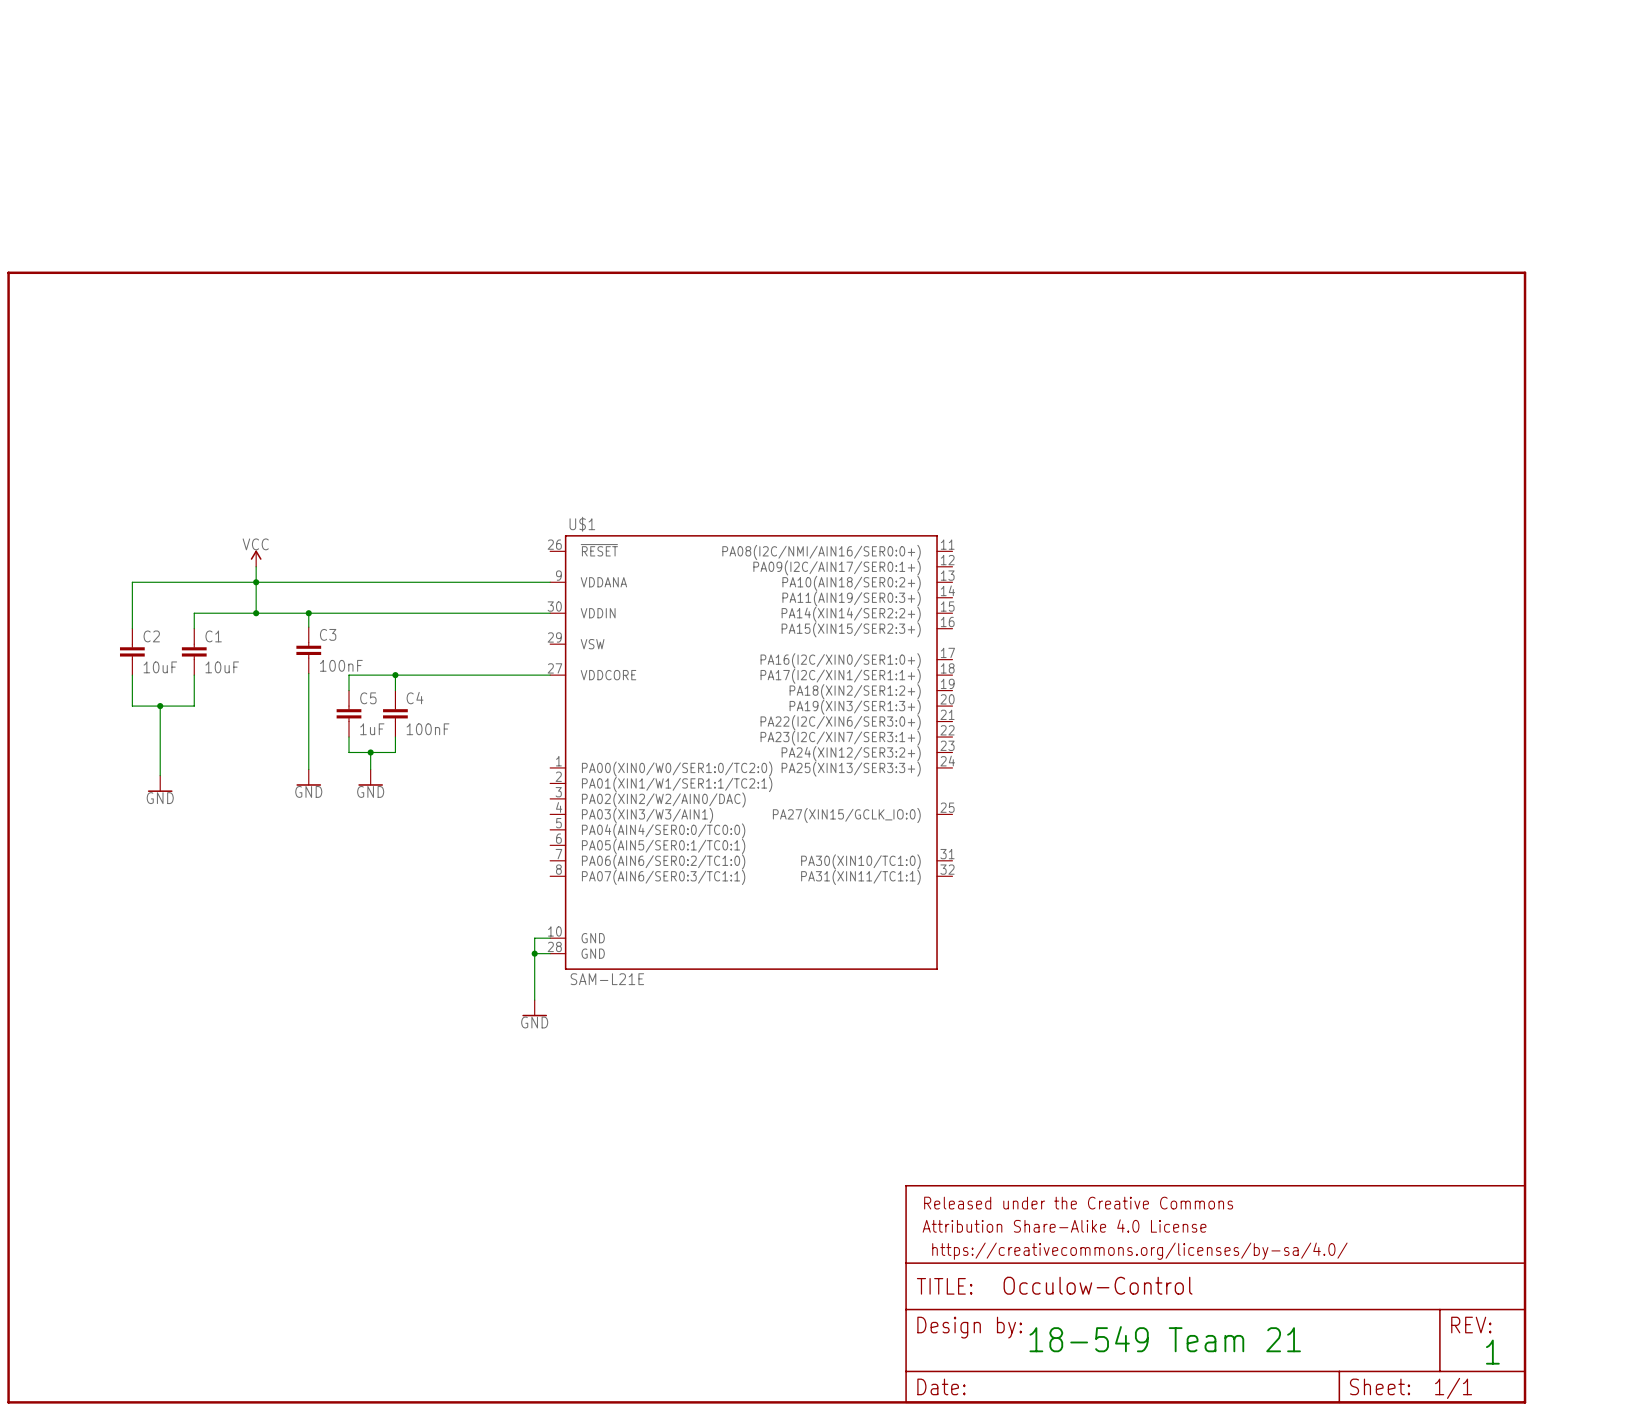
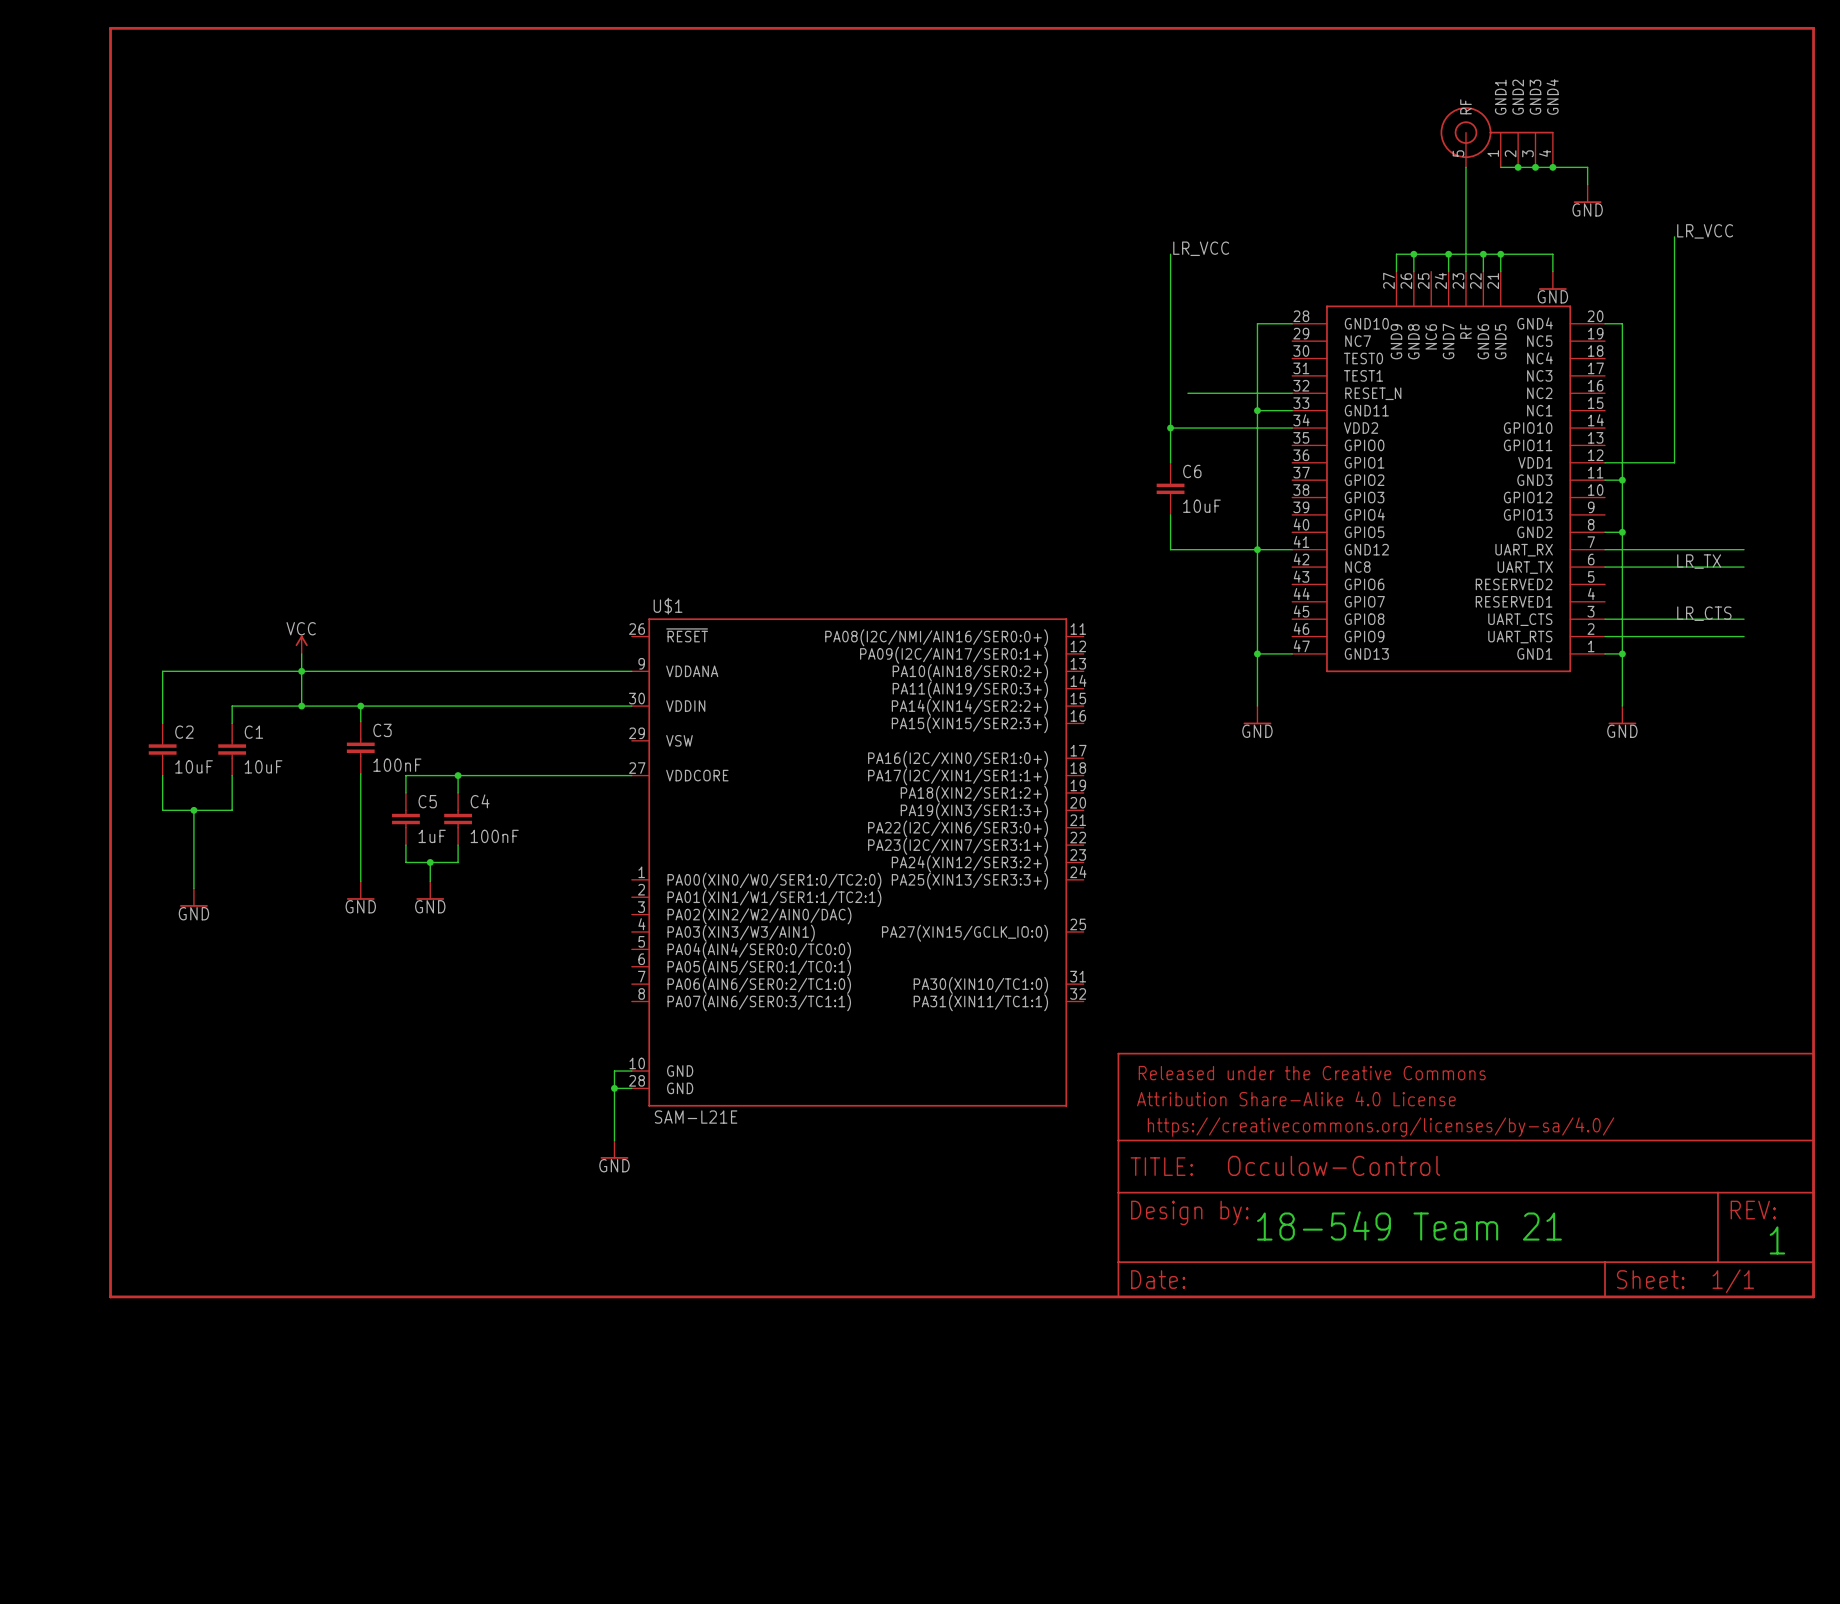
part: none -> (1497, 137)
wire: none -> (1465, 167) (1465, 271)
wire: none -> (1500, 167) (1587, 167) (1587, 184)
junction: none -> (1518, 167)
junction: none -> (1535, 167)
junction: none -> (1552, 167)
power symbol: none -> GND (1587, 193)
label: none -> LR_VCC (1705, 231)
wire: none -> (1674, 236) (1674, 462) (1605, 462)
label: none -> LR_VCC (1201, 248)
wire: none -> (1170, 254) (1170, 462)
wire: none -> (1413, 254) (1413, 271)
junction: none -> (1413, 254)
wire: none -> (1448, 254) (1448, 271)
junction: none -> (1448, 254)
wire: none -> (1483, 254) (1483, 271)
junction: none -> (1483, 254)
wire: none -> (1500, 254) (1500, 271)
junction: none -> (1500, 254)
wire: none -> (1396, 271) (1396, 254) (1552, 254) (1552, 271)
power symbol: none -> GND (1552, 280)
wire: none -> (1292, 323) (1257, 323) (1257, 706)
wire: none -> (1605, 323) (1622, 323) (1622, 706)
wire: none -> (1187, 393) (1292, 393)
wire: none -> (1257, 410) (1292, 410)
junction: none -> (1257, 410)
wire: none -> (1170, 428) (1292, 428)
junction: none -> (1170, 428)
part: none -> (1448, 471)
wire: none -> (1605, 480) (1622, 480)
junction: none -> (1622, 480)
C6: none -> 10uF (1170, 488)
wire: none -> (1170, 514) (1170, 549) (1292, 549)
wire: none -> (1605, 532) (1622, 532)
junction: none -> (1622, 532)
junction: none -> (1257, 549)
wire: none -> (1605, 549) (1744, 549)
label: none -> LR_TX (1699, 561)
wire: none -> (1605, 567) (1744, 567)
label: none -> LR_CTS (1704, 613)
wire: none -> (1605, 619) (1744, 619)
wire: none -> (1605, 636) (1744, 636)
wire: none -> (1257, 653) (1292, 653)
junction: none -> (1257, 653)
wire: none -> (1605, 653) (1622, 653)
junction: none -> (1622, 653)
part: none -> (962, 662)
power symbol: none -> GND (1257, 715)
power symbol: none -> GND (1622, 715)
part: (766, 837) -> none
part: none -> (1465, 1175)
text: none -> 18-549 Team 21 (1409, 1225)
text: none -> 1 (1777, 1240)
part: (1215, 1294) -> none
text: 18-549 Team 21 (1165, 1339) -> none
text: 1 (1492, 1352) -> none

